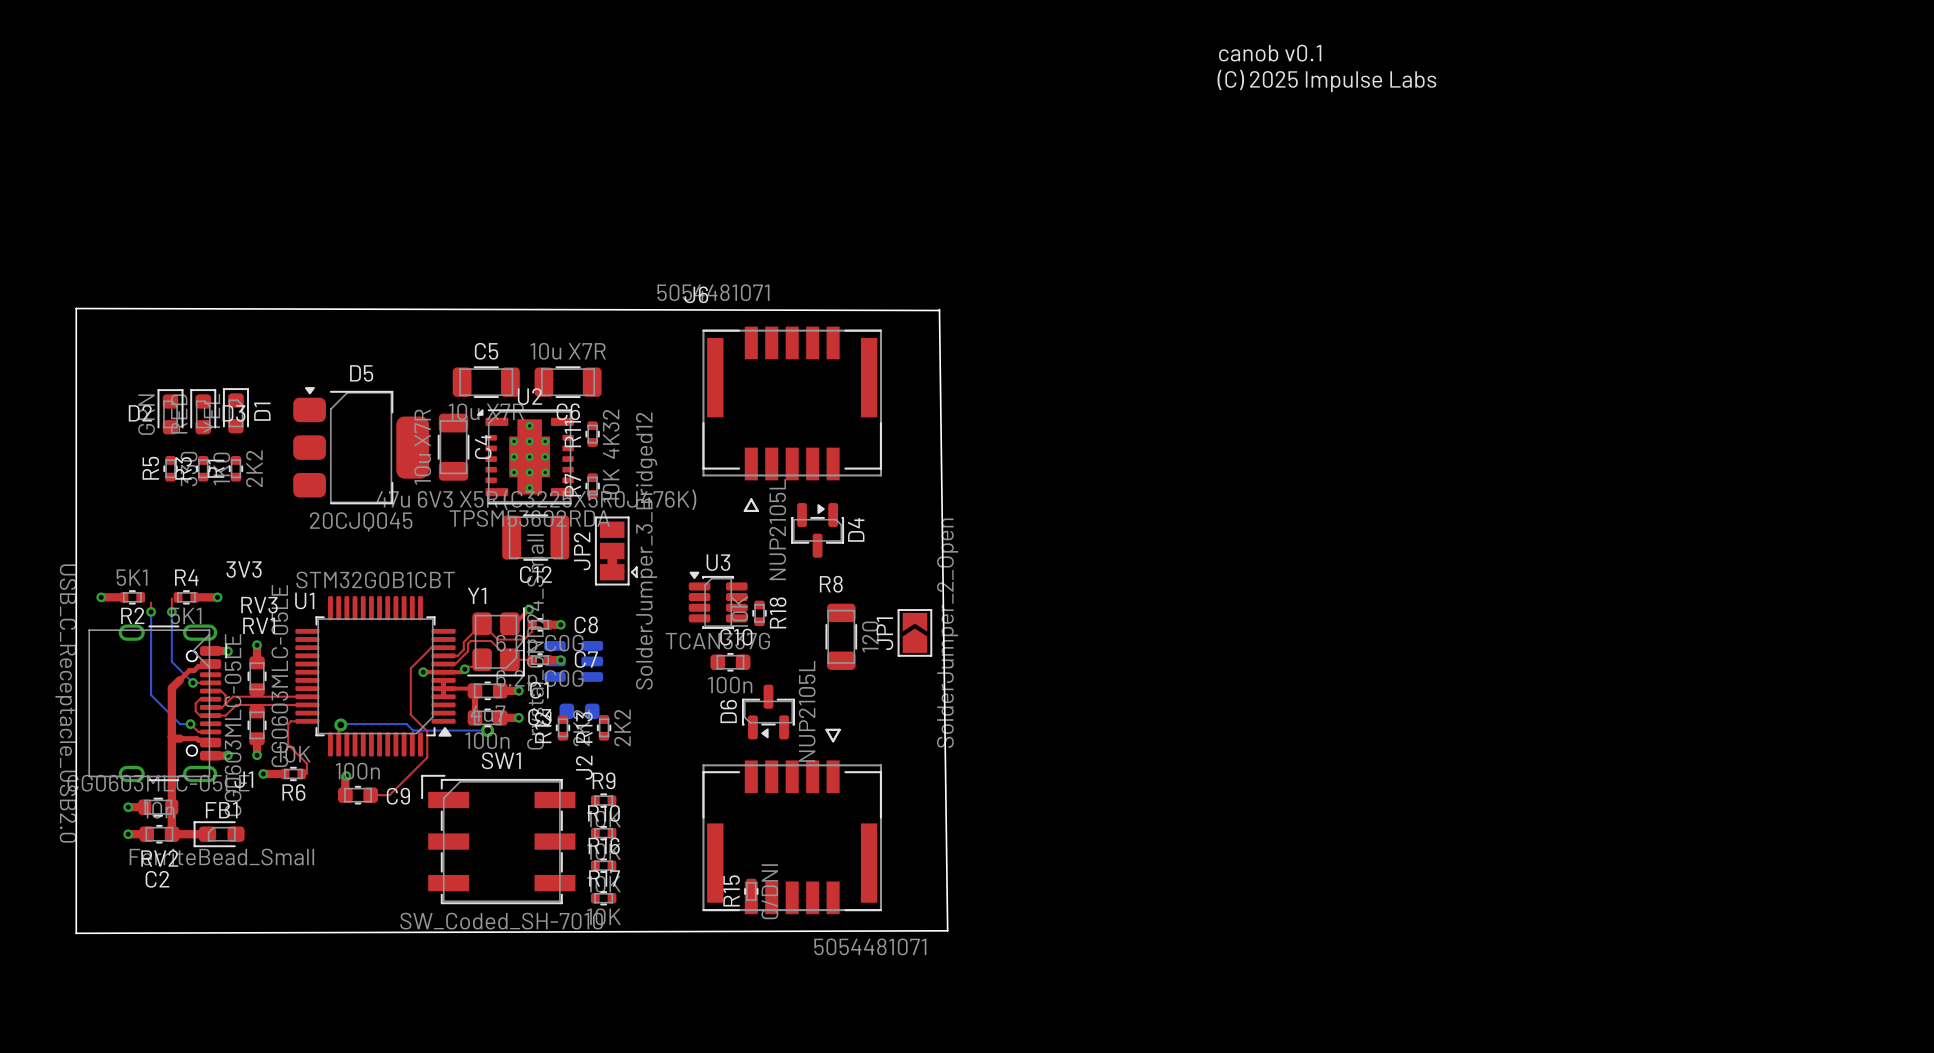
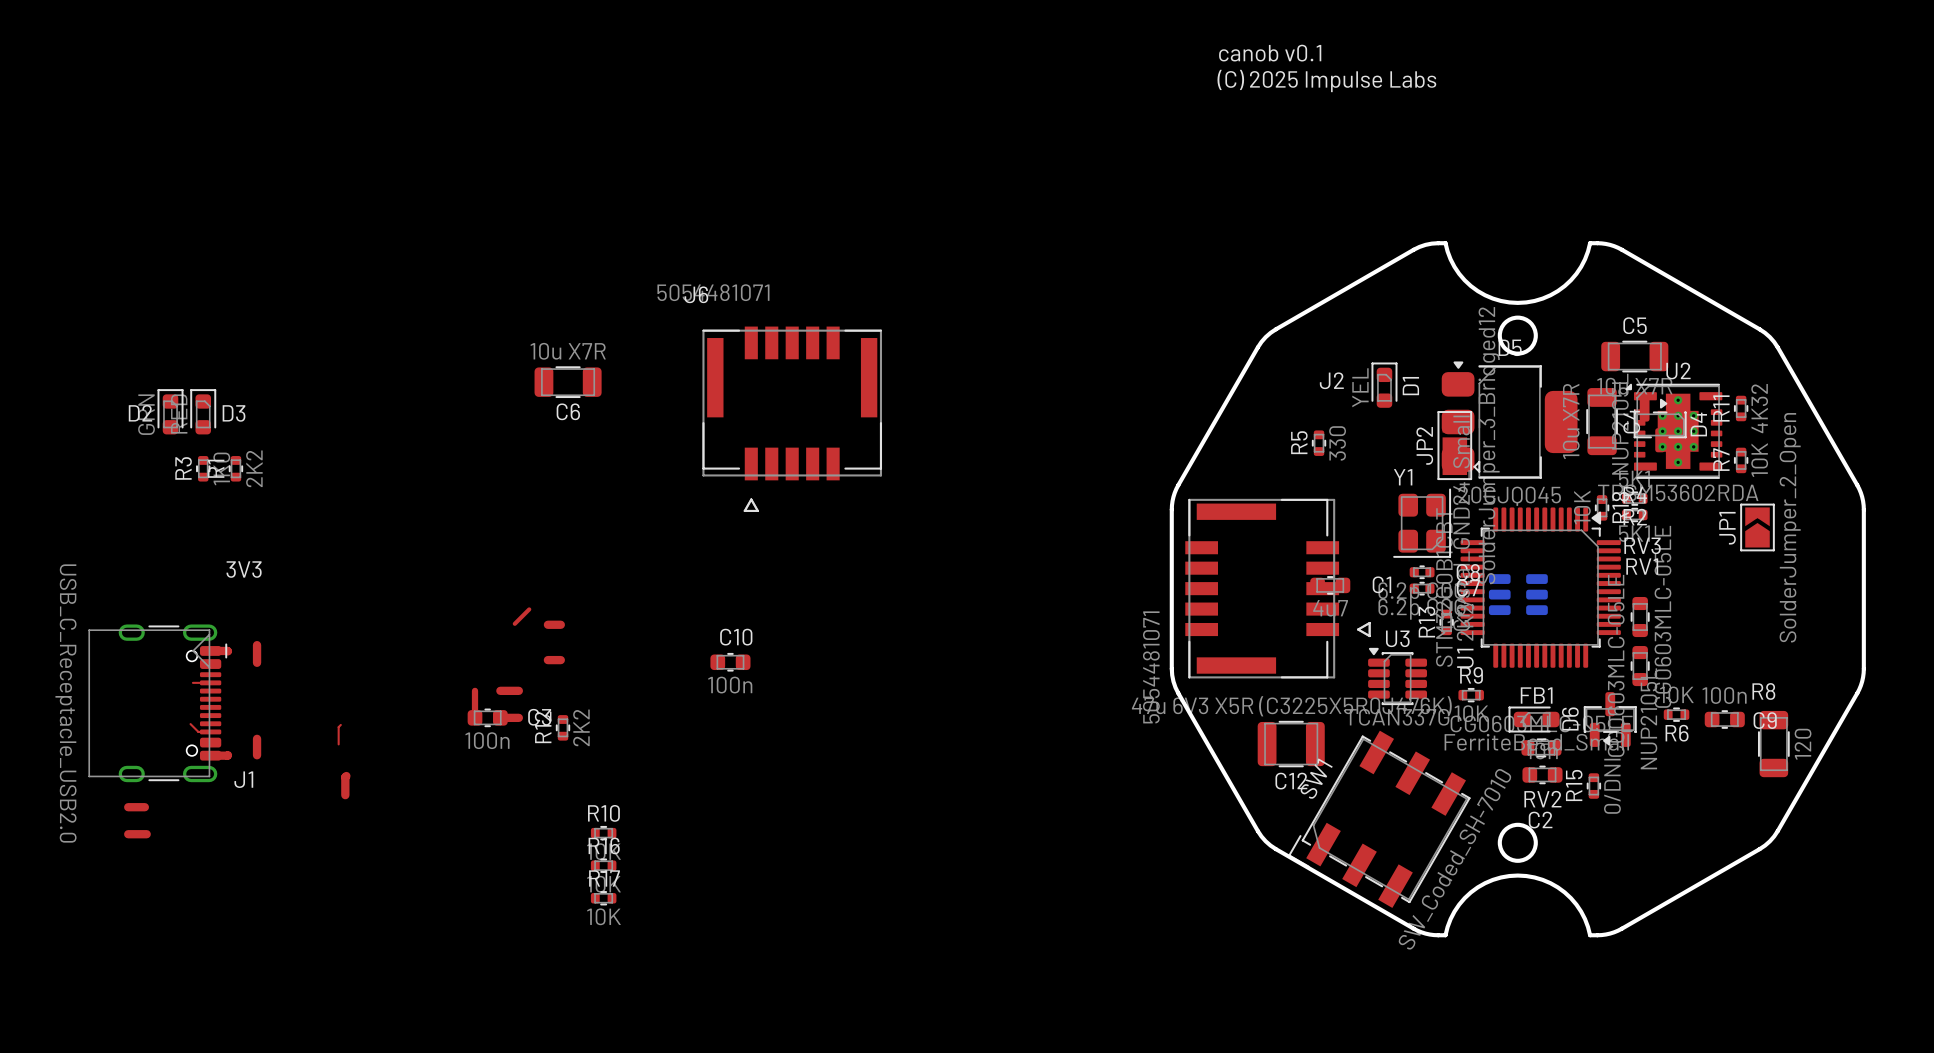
board edge: none -> (1438, 243) (1445, 243) (1454, 266) (1470, 286) (1492, 298) (1517, 302) (1542, 298) (1564, 286) (1581, 266) (1590, 243) (1610, 244) (1621, 249) (1759, 329) (1769, 337) (1777, 347) (1857, 485) (1862, 497) (1863, 509) (1863, 668) (1862, 681) (1857, 693) (1777, 831) (1769, 841) (1759, 849) (1621, 928) (1610, 933) (1590, 935) (1581, 911) (1564, 892) (1542, 879) (1517, 875) (1492, 879) (1470, 892) (1454, 911) (1445, 935) (1429, 934) (1413, 928) (1275, 849) (1265, 841) (1257, 831) (1178, 693) (1173, 681) (1171, 668) (1171, 509) (1173, 496) (1178, 485) (1257, 347) (1265, 337) (1275, 329) (1413, 249) (1425, 244) (1438, 243)
board edge: (939, 309) (947, 930) (76, 933) (76, 308) (939, 310) -> none
round board edge: none -> [1497, 315, 1538, 356]
C5 position: (486, 382) -> (1634, 356)
D1 position: (235, 410) -> (1384, 385)
R11 position: (592, 434) -> (1741, 408)
D5 position: (361, 445) -> (1509, 420)
C4 position: (453, 447) -> (1602, 421)
U2 position: (525, 456) -> (1673, 431)
R5 position: (170, 468) -> (1319, 443)
R7 position: (592, 486) -> (1741, 460)
D4 position: (817, 530) -> (1660, 424)
C12 position: (535, 537) -> (1291, 744)
JP2 position: (616, 551) -> (1458, 445)
part: none -> (1518, 594)
top track: (101, 597) (118, 597) -> none
via: (101, 597) -> none
R2 position: (132, 597) -> (1634, 498)
R4 position: (186, 597) -> (1634, 515)
top track: (199, 597) (217, 597) -> none
via: (217, 597) -> none
top track: (171, 598) (171, 611) -> none
U3 position: (718, 600) -> (1397, 676)
top track: (151, 602) (151, 611) -> none
via: (529, 609) -> none
bottom track: (151, 611) (151, 695) (180, 724) (190, 724) -> none
via: (151, 611) -> none
bottom track: (171, 611) (171, 661) (192, 682) -> none
via: (171, 611) -> none
R18 position: (759, 613) -> (1602, 507)
top track: (532, 624) (532, 631) (524, 639) (497, 639) (482, 623) (463, 642) (463, 649) (457, 655) (443, 655) -> none
C8 position: (540, 624) -> (1422, 572)
via: (560, 624) -> none
JP1 position: (914, 632) -> (1757, 527)
R8 position: (841, 636) -> (1773, 744)
Y1 position: (495, 641) -> (1422, 523)
via: (257, 645) -> none
top track: (443, 647) (431, 647) (410, 668) (410, 714) (427, 731) (427, 757) (389, 795) (370, 795) -> none
via: (227, 651) -> none
top track: (531, 659) (509, 659) (491, 640) (470, 640) (467, 643) (467, 651) (455, 664) (443, 664) -> none
C7 position: (540, 660) -> (1422, 588)
via: (560, 660) -> none
part: (573, 661) -> none
top track: (208, 666) (198, 666) (194, 670) (189, 670) (171, 688) (171, 834) -> none
top track: (466, 666) (475, 666) -> none
via: (464, 669) -> none
via: (423, 672) -> none
RV3 position: (257, 676) -> (1640, 617)
U1 rotation: 0° (375, 676) -> 90° counterclockwise (1540, 587)
U1 position: (375, 676) -> (1540, 587)
via: (192, 682) -> none
top track: (443, 682) (443, 695) -> none
top track: (443, 688) (472, 688) -> none
C1 position: (487, 690) -> (1330, 585)
via: (518, 690) -> none
top track: (210, 691) (221, 691) (225, 695) (225, 704) -> none
top track: (307, 696) (232, 696) (222, 707) -> none
top track: (210, 699) (199, 699) (195, 703) (195, 711) (199, 715) (225, 715) (236, 704) (307, 704) -> none
part: (579, 711) -> none
D6 position: (768, 712) -> (1610, 719)
via: (518, 717) -> none
top track: (307, 721) (291, 721) (288, 724) (288, 744) (306, 763) (306, 773) -> none
via: (190, 724) -> none
bottom track: (340, 724) (406, 724) (413, 730) (487, 730) -> none
via: (340, 724) -> none
RV1 position: (257, 725) -> (1640, 666)
R13 position: (604, 727) -> (1446, 622)
via: (487, 730) -> none
top track: (171, 736) (173, 738) (208, 740) -> none
via: (227, 755) -> none
via: (257, 755) -> none
top track: (263, 773) (279, 773) -> none
via: (263, 773) -> none
R6 position: (293, 773) -> (1676, 714)
via: (346, 776) -> none
C9 position: (358, 795) -> (1724, 719)
R9 position: (603, 800) -> (1471, 695)
via: (128, 807) -> none
RV2 position: (158, 807) -> (1541, 747)
J2 rotation: 0° (792, 821) -> 90° clockwise (1277, 588)
J2 position: (792, 821) -> (1277, 588)
round board edge: none -> [1497, 822, 1538, 863]
via: (128, 834) -> none
C2 position: (159, 834) -> (1542, 774)
top track: (172, 834) (207, 834) -> none
FB1 position: (219, 834) -> (1534, 719)
SW1 rotation: 0° (498, 839) -> 60° counterclockwise (1379, 819)
SW1 position: (498, 839) -> (1379, 819)
R15 position: (751, 891) -> (1593, 786)

